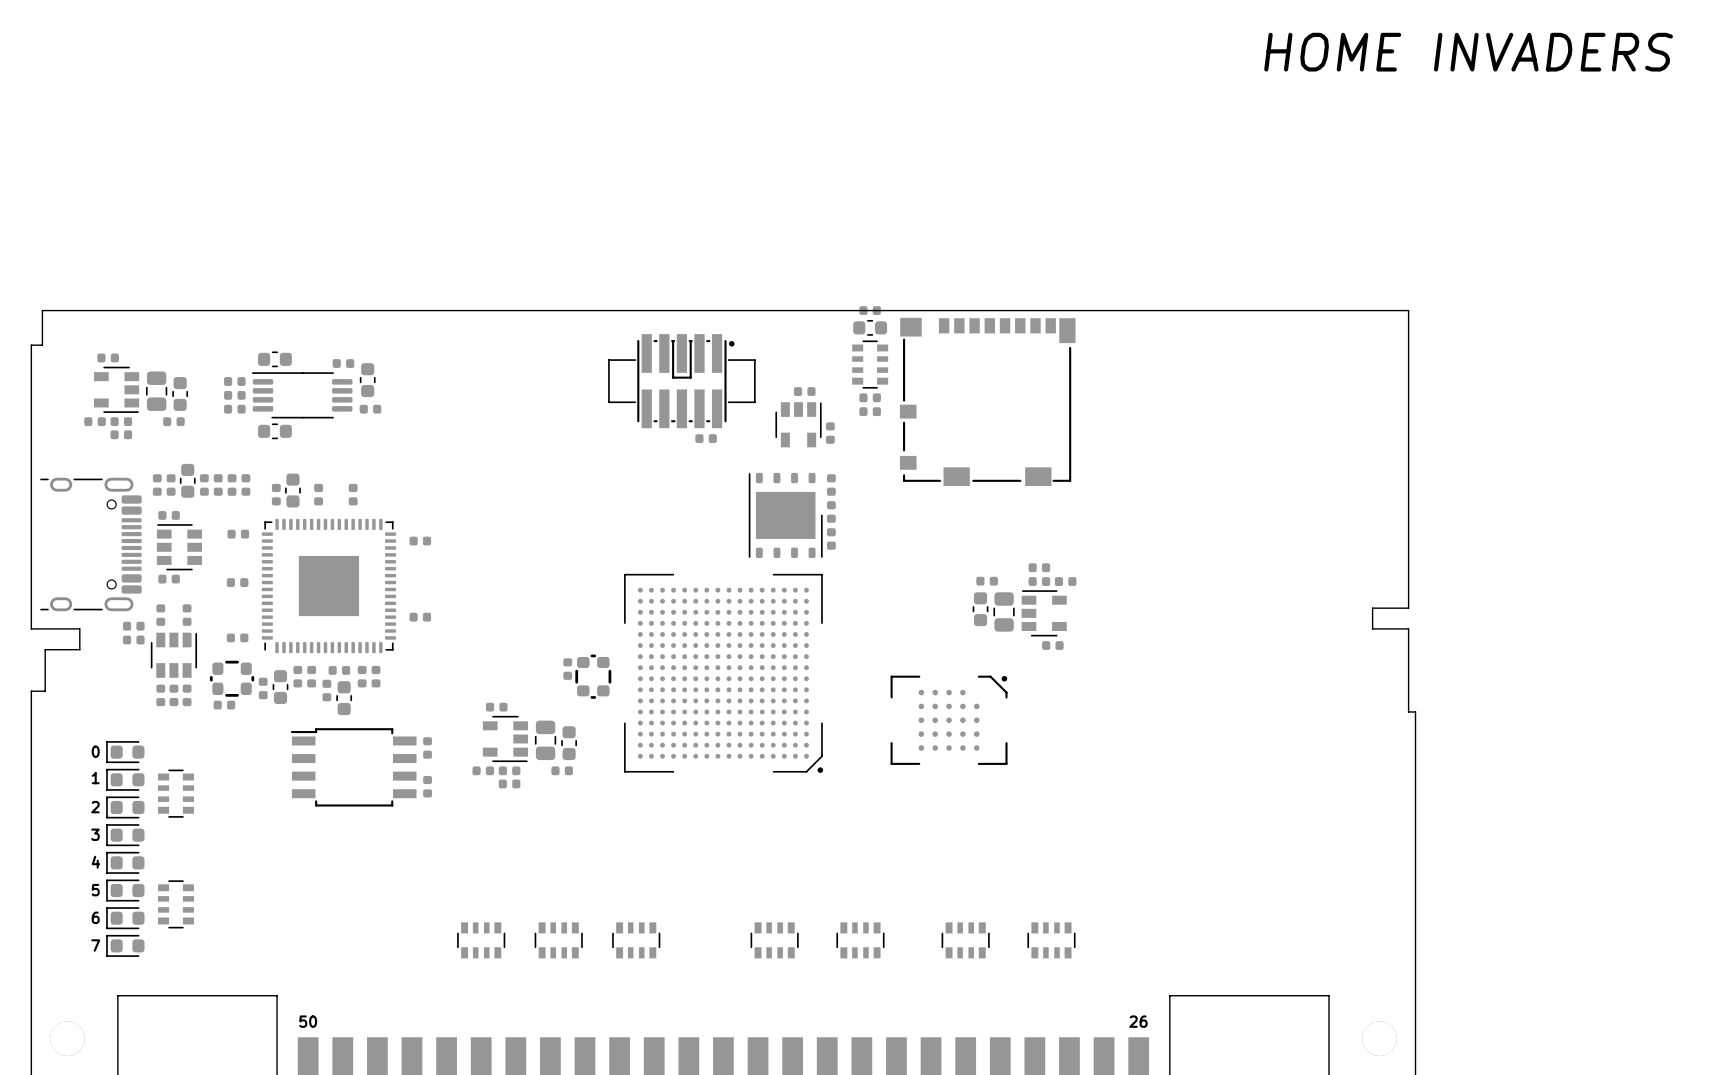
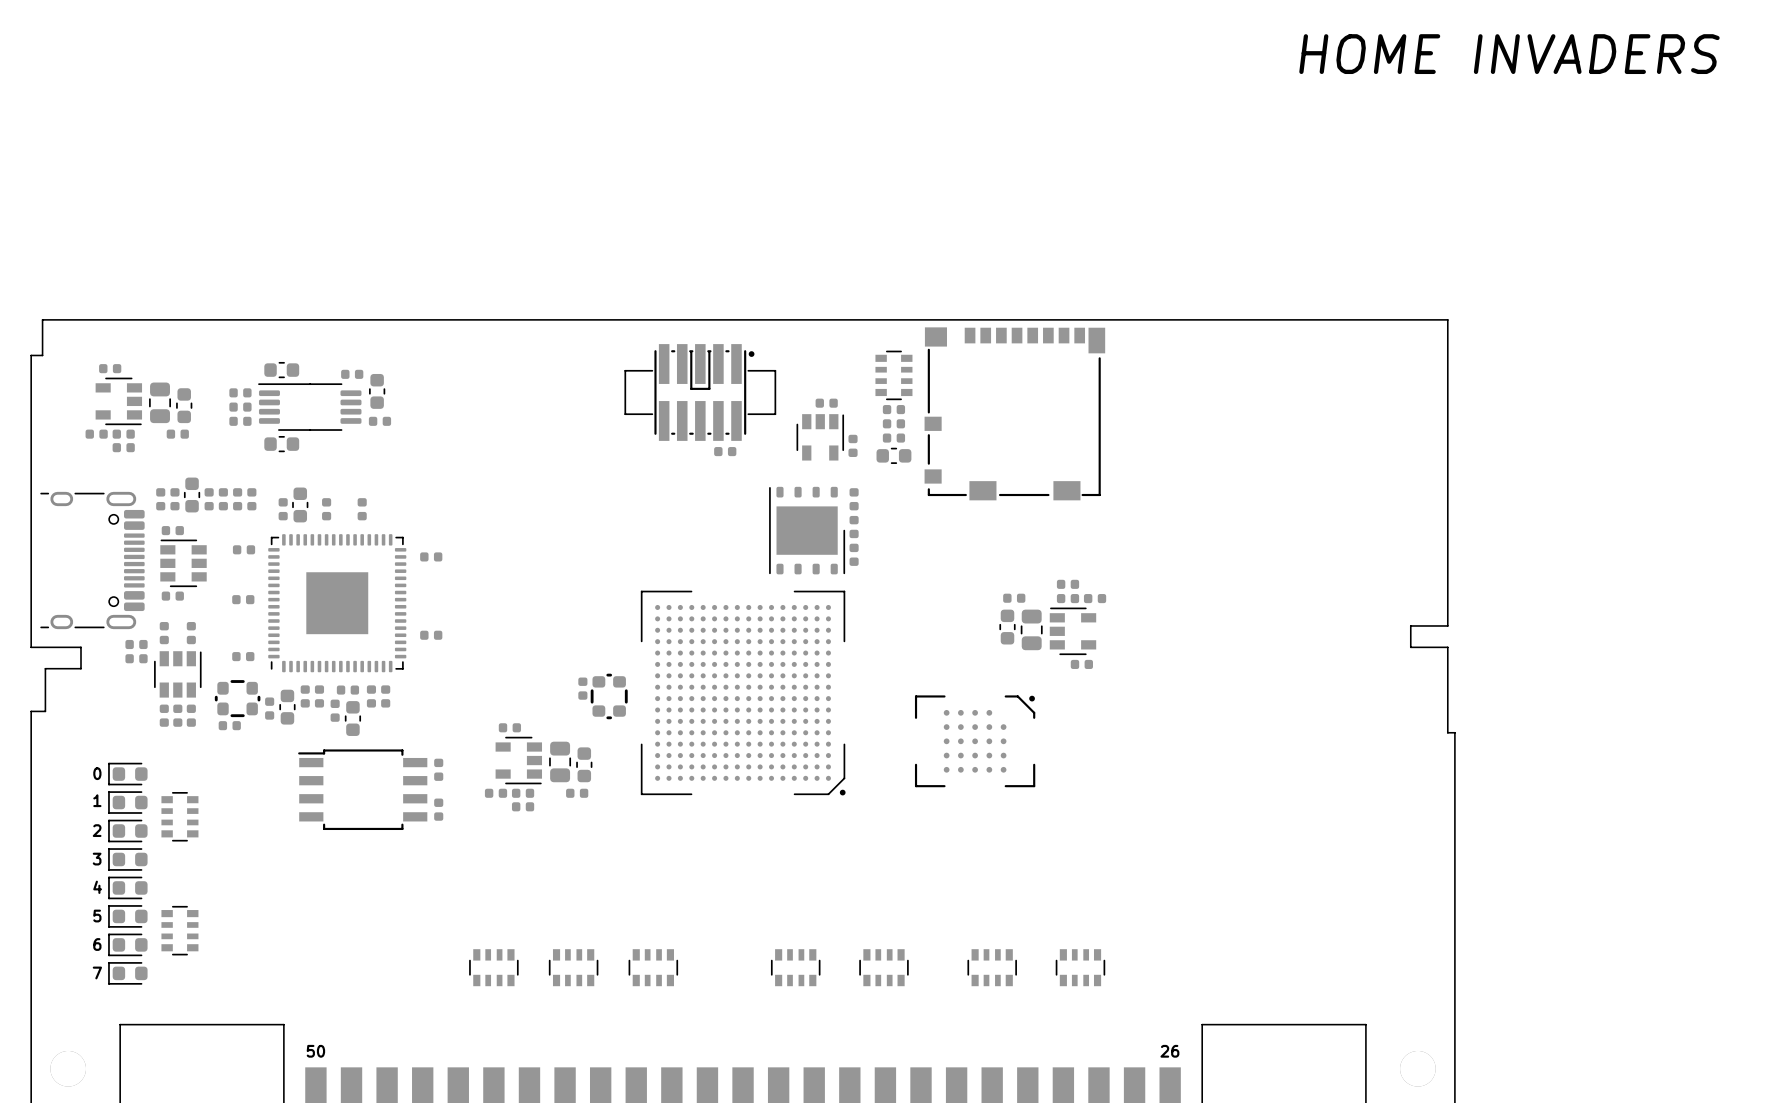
part position: (870, 310) -> (893, 438)
part position: (870, 327) -> (893, 455)

